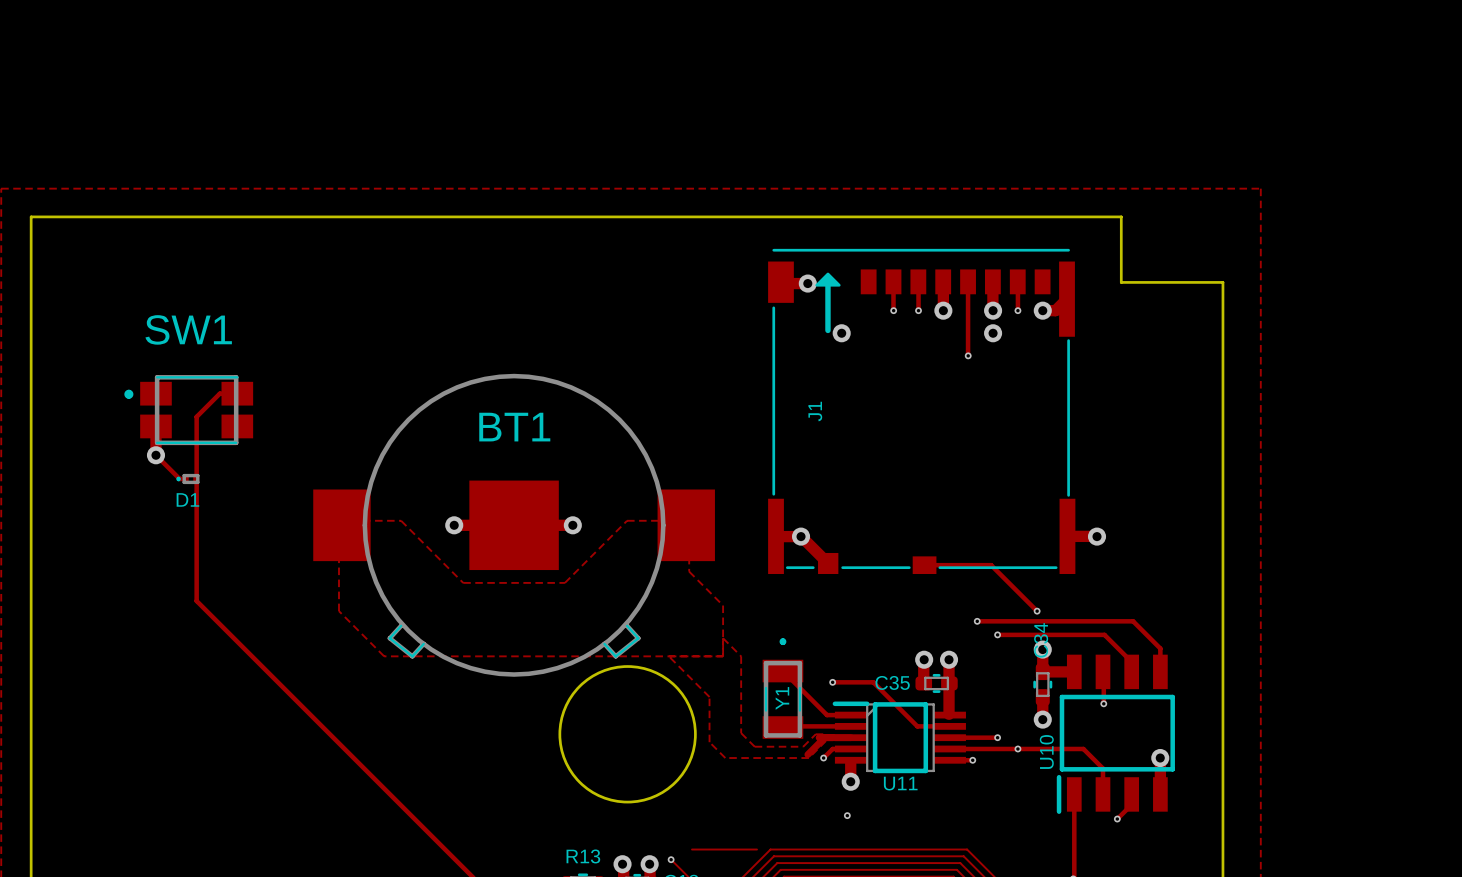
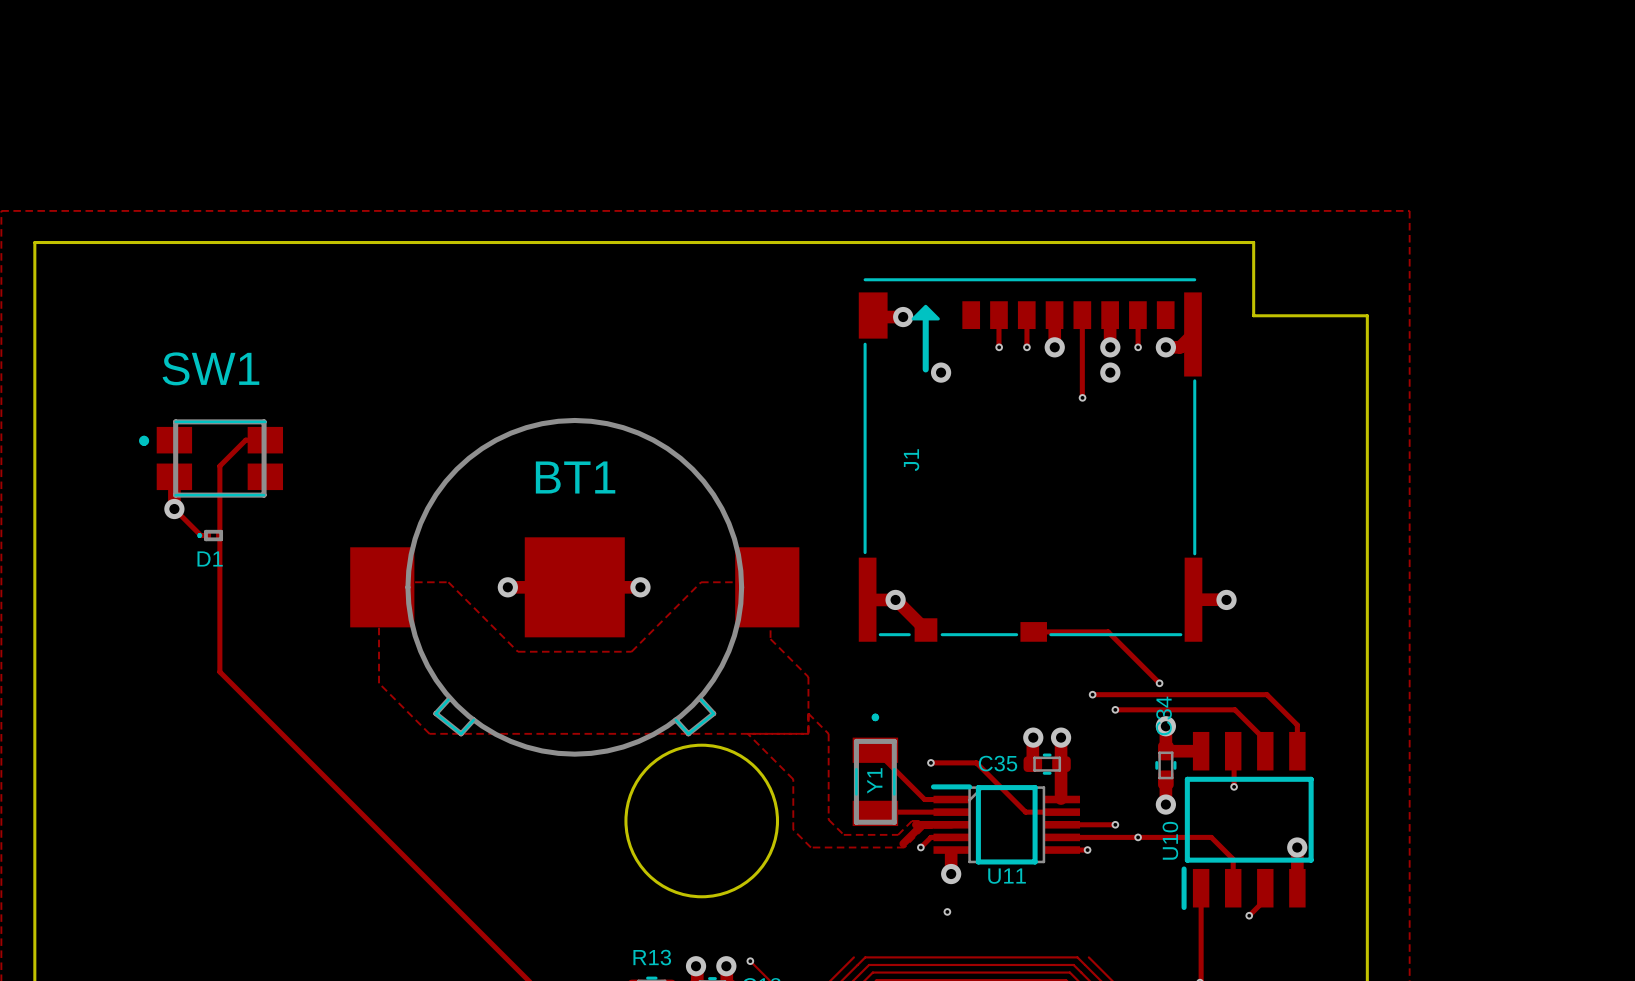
track: (692, 849) (756, 849) -> none
track: (763, 856) (770, 849) (967, 849) (973, 856) -> none

